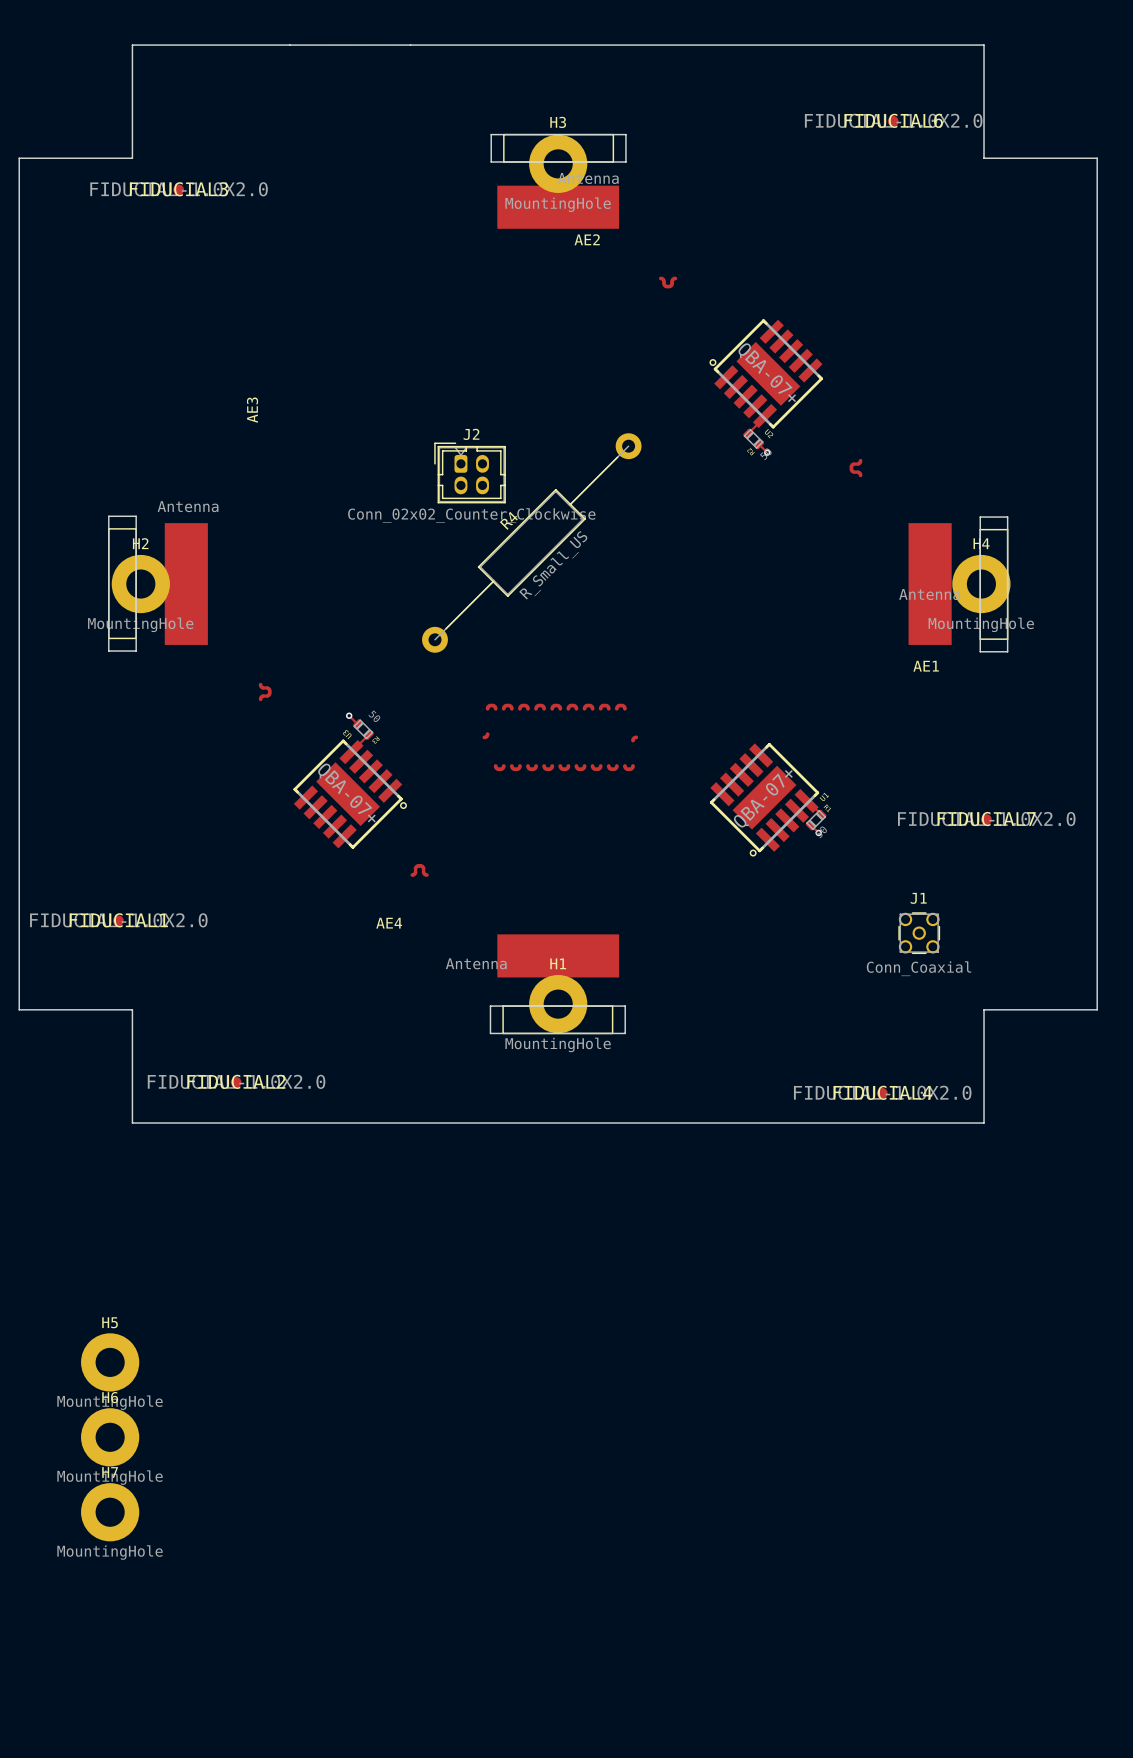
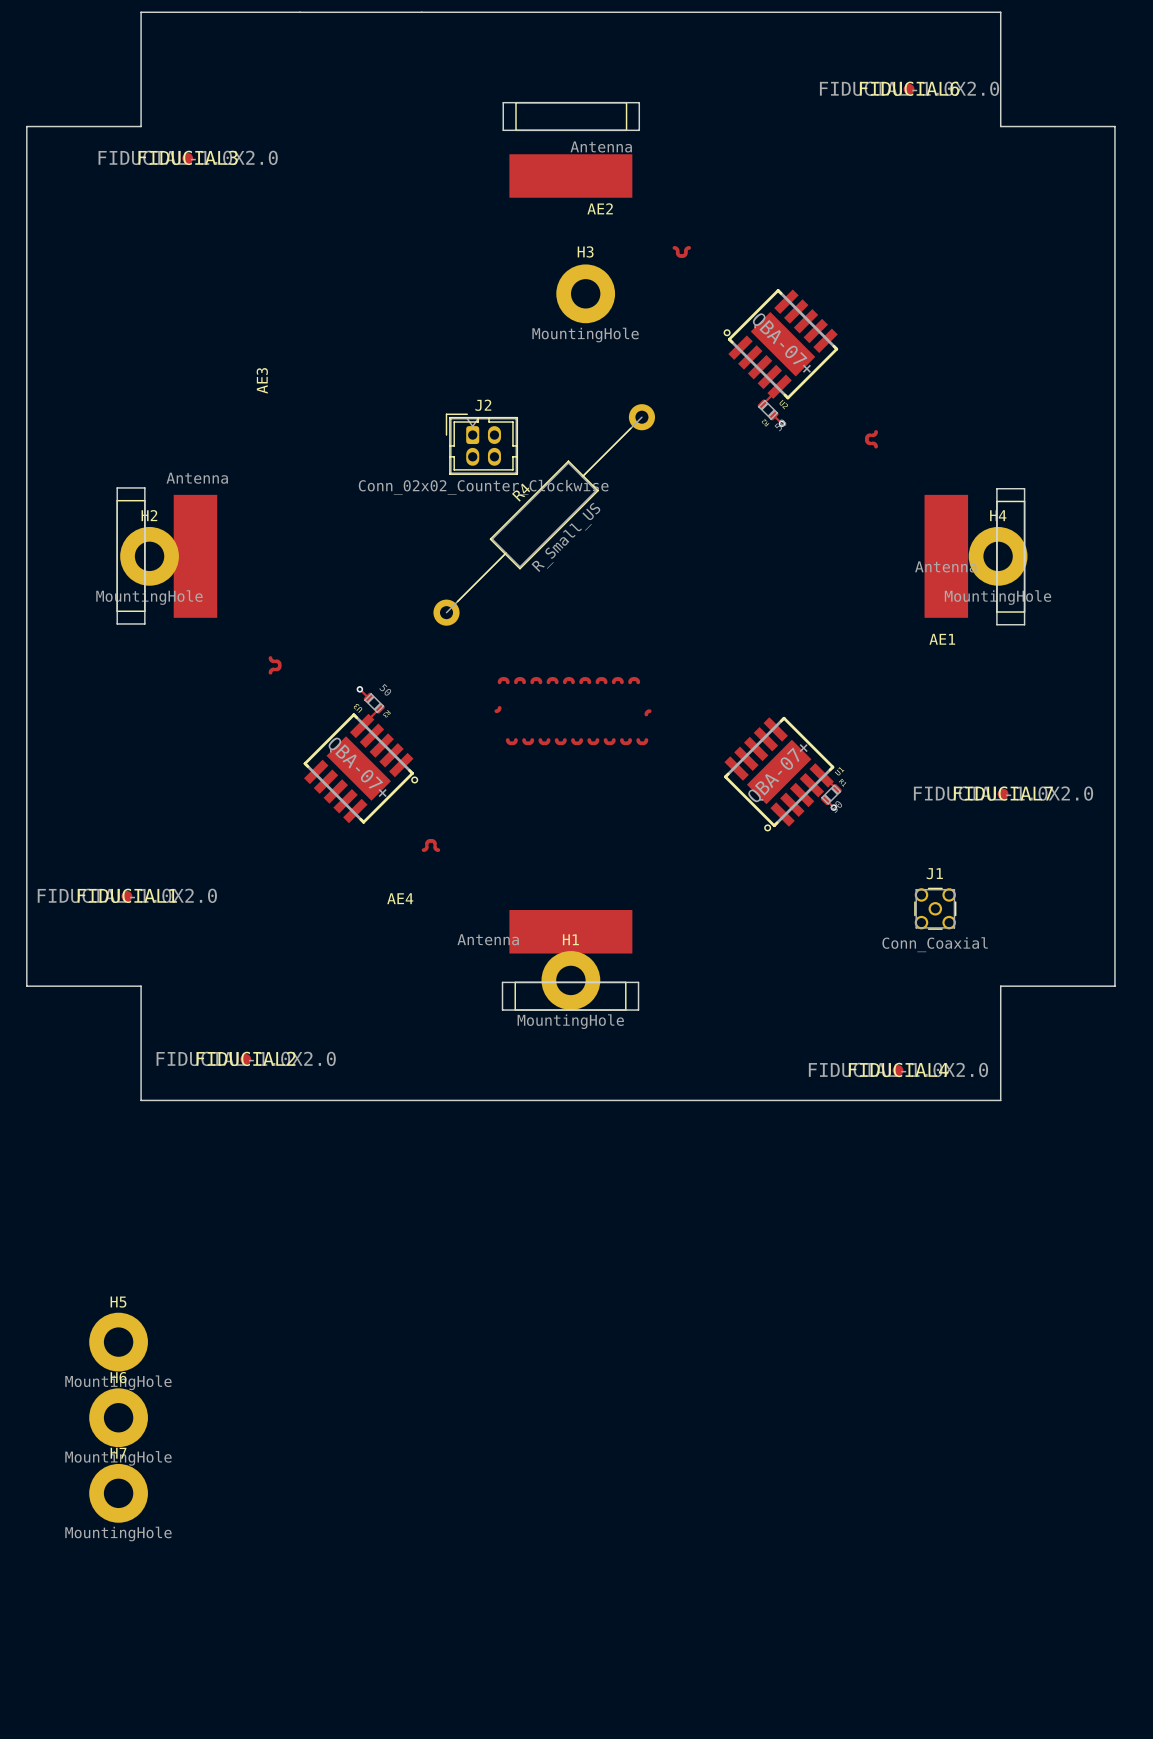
H3 position: (558, 163) -> (585, 293)

